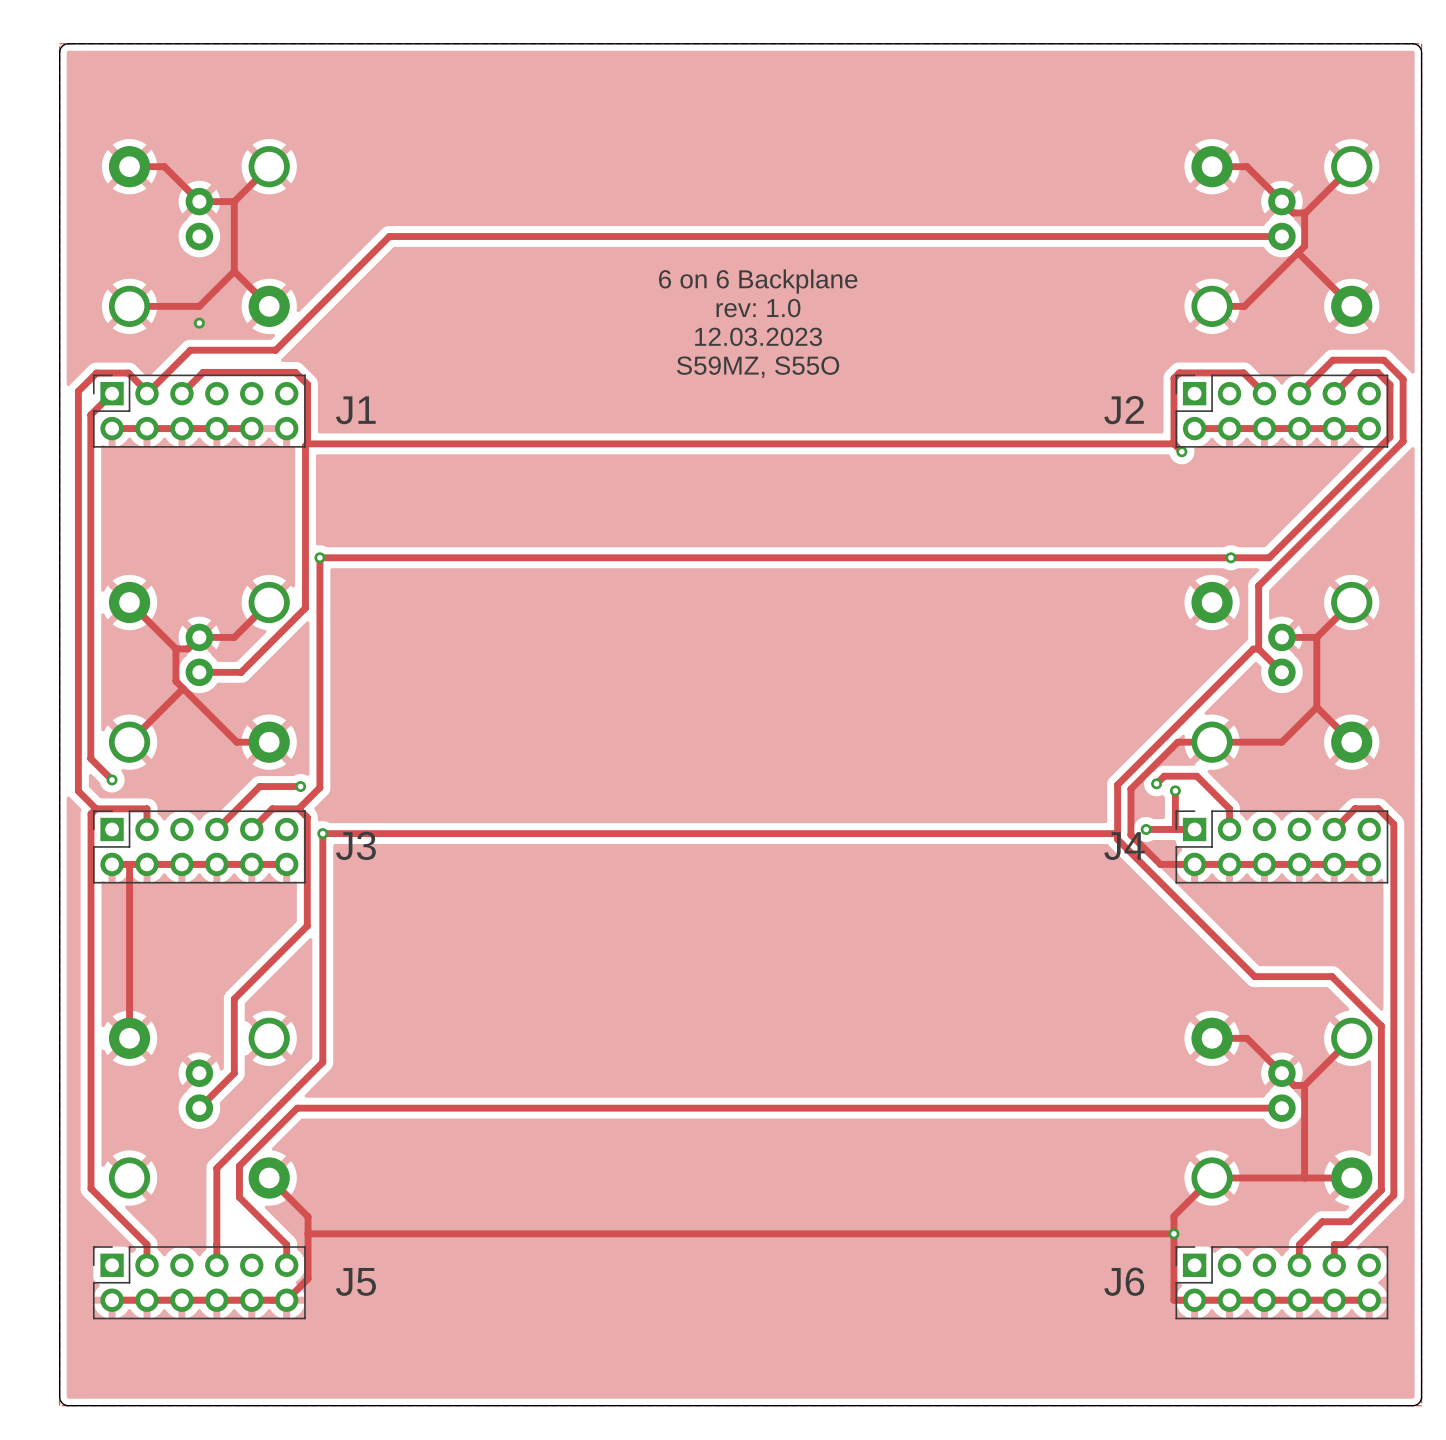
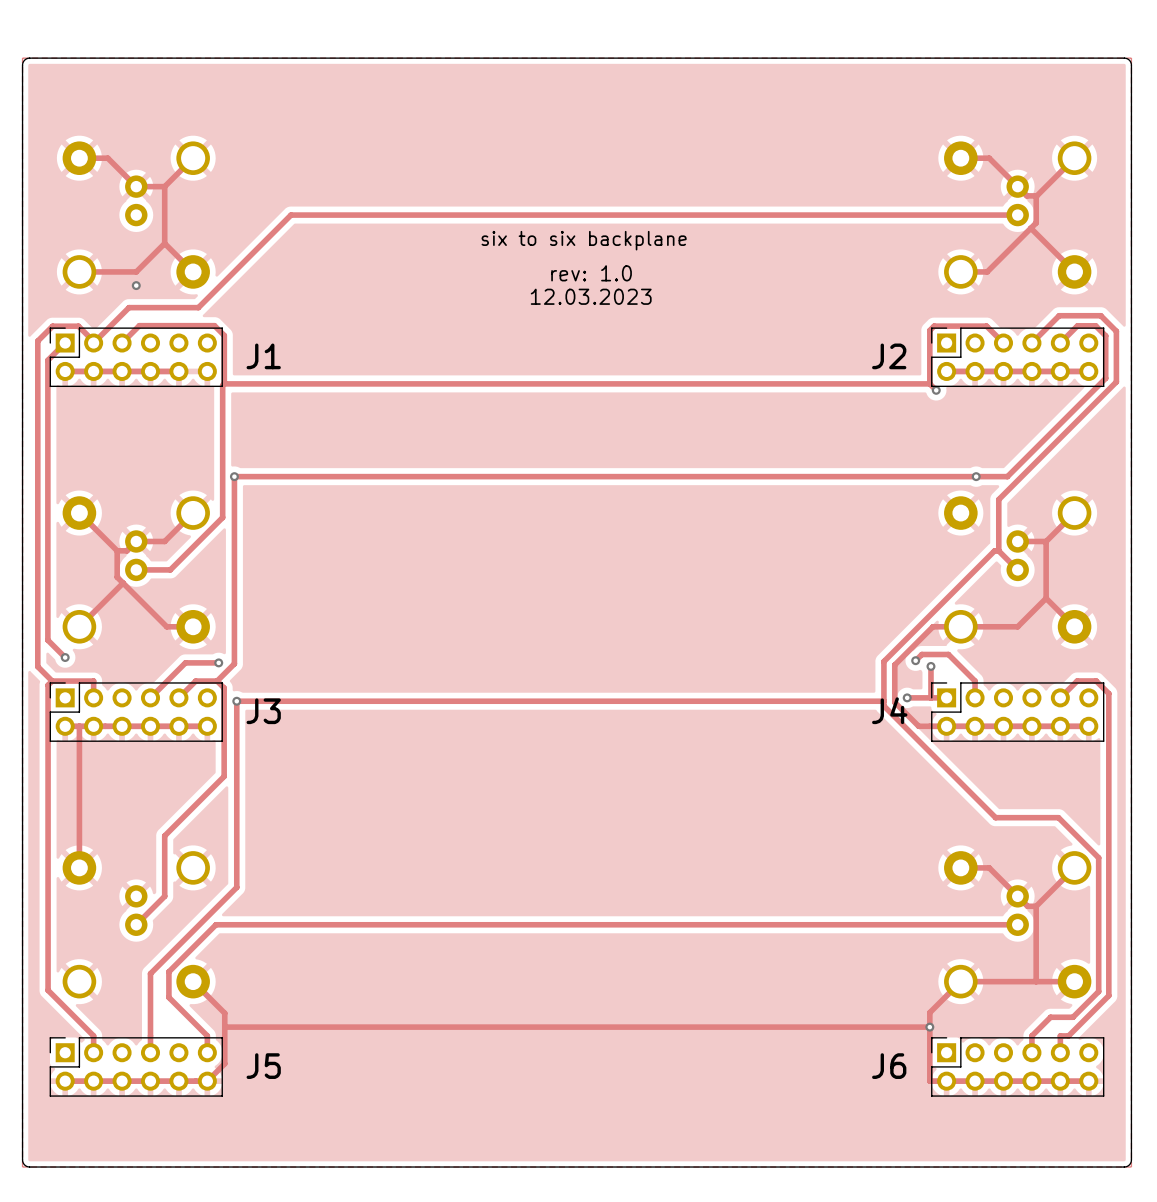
text: 6 on 6 Backplane (758, 281) -> six to six backplane (584, 240)
text: S59MZ, S55O (758, 367) -> none

